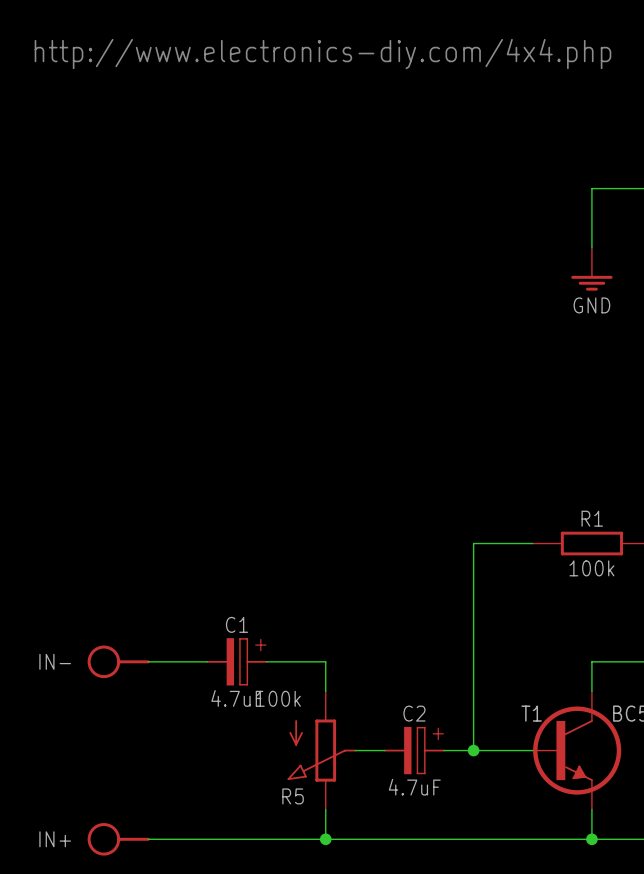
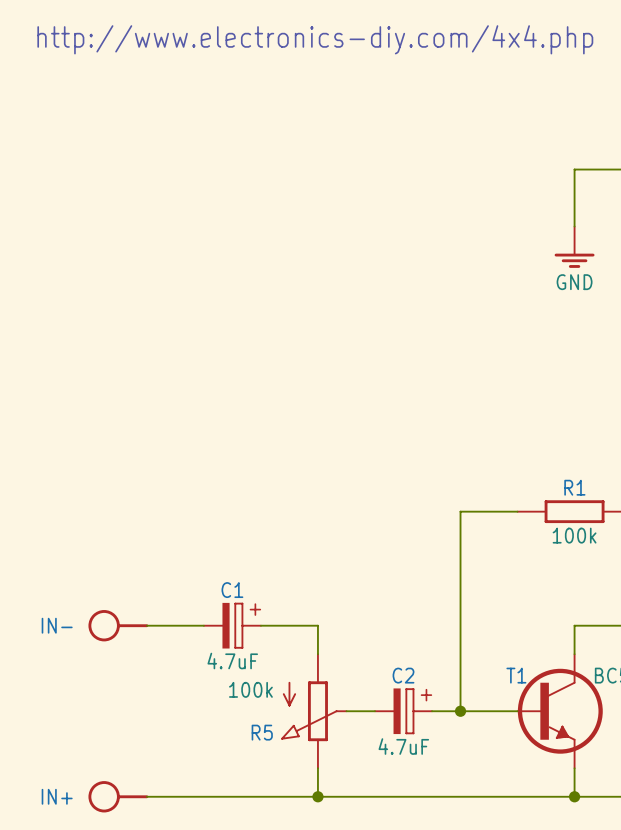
R5 value position: 100k (278, 698) -> 100k (250, 689)
R5 name position: R5 (293, 796) -> R5 (262, 732)

